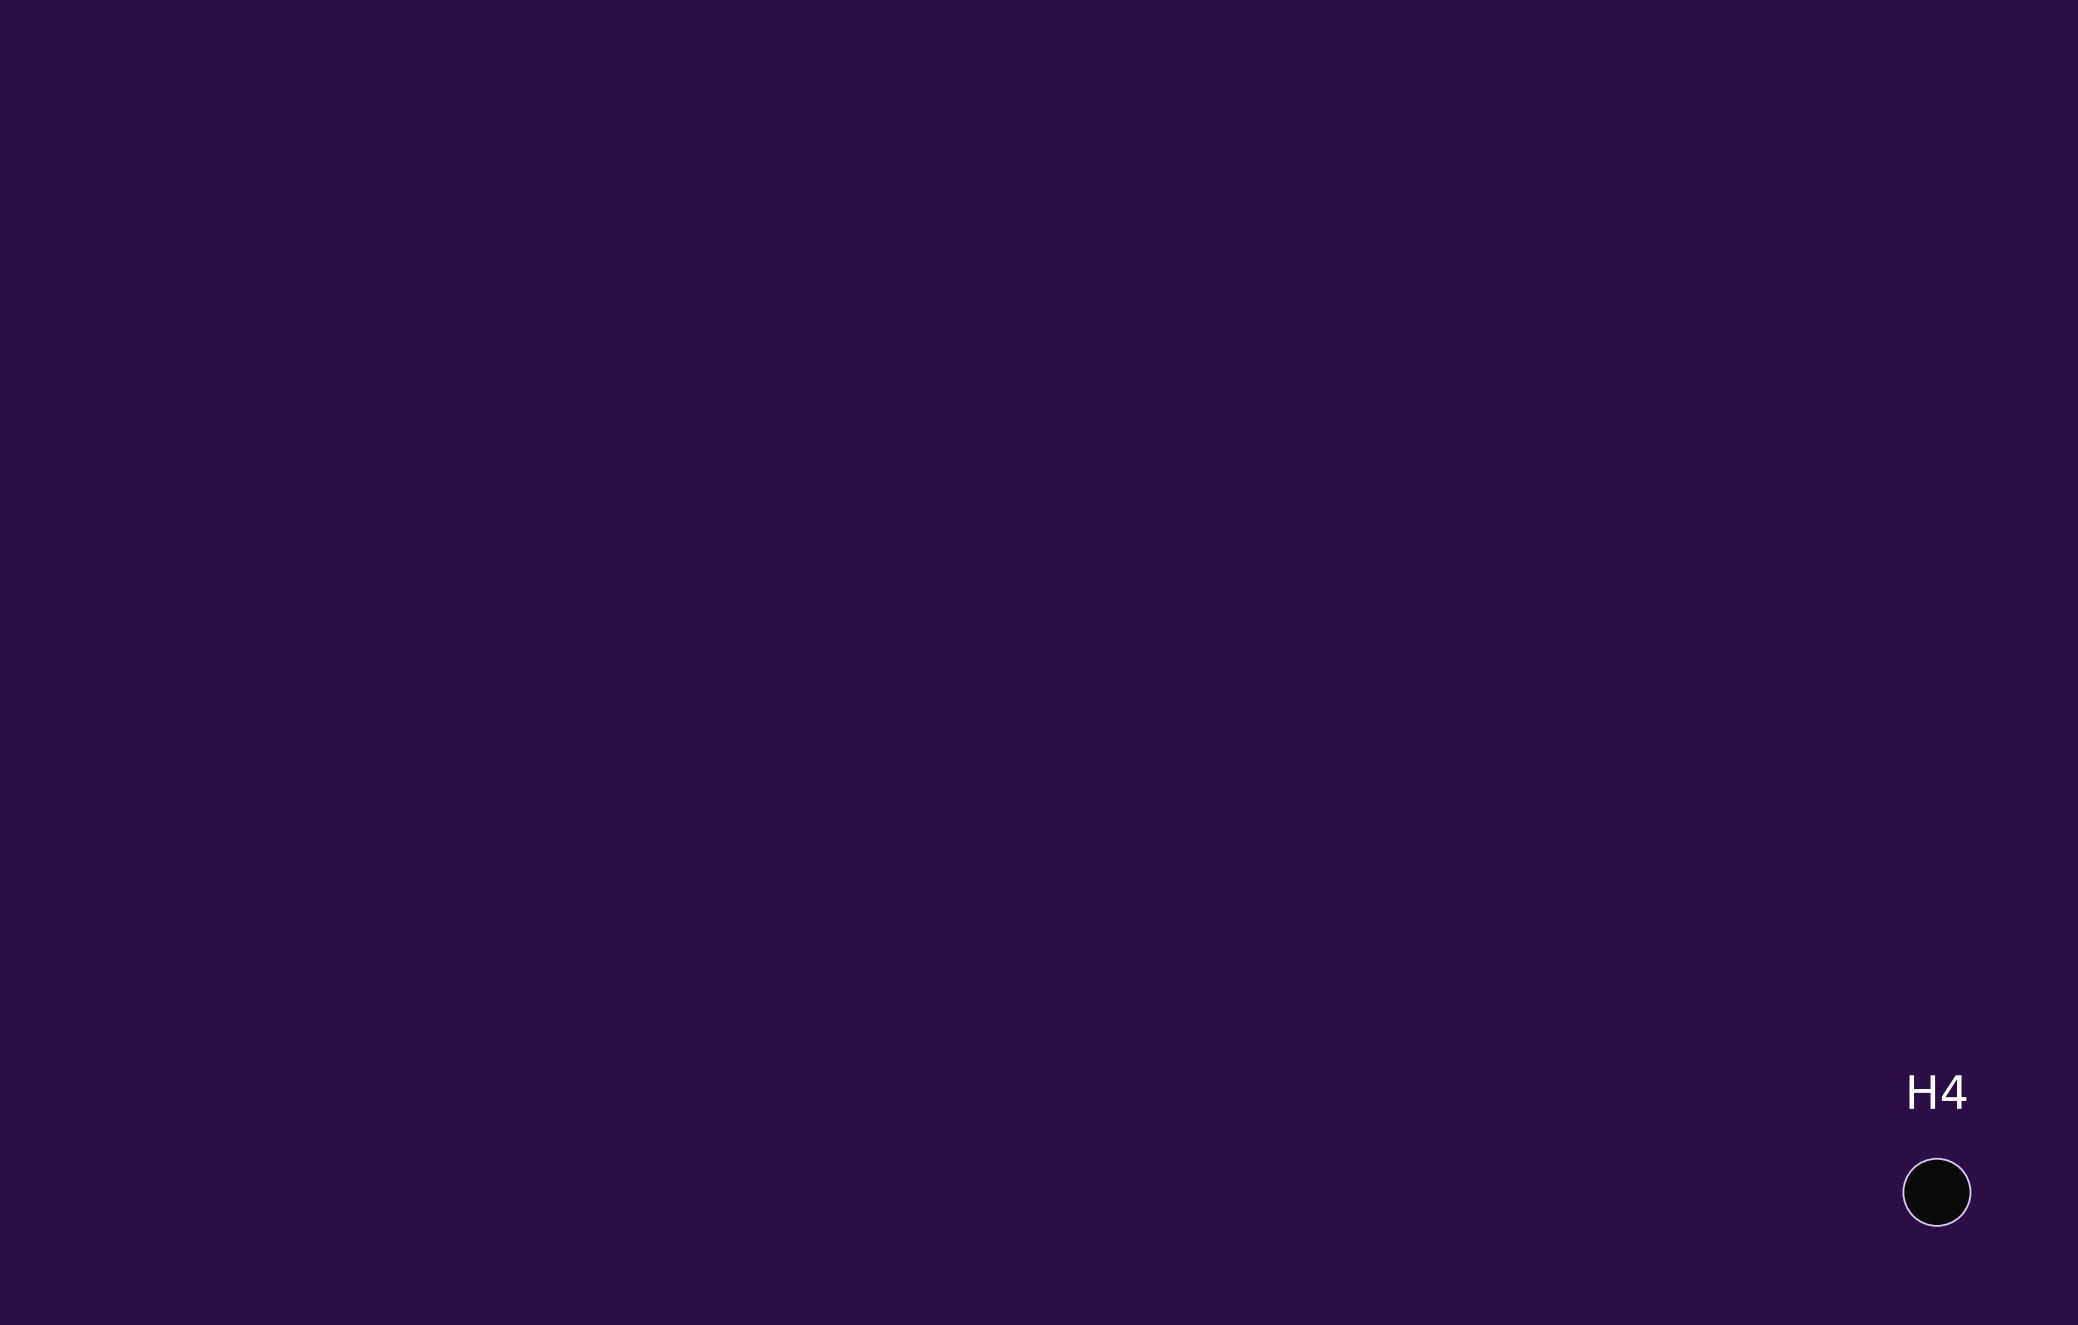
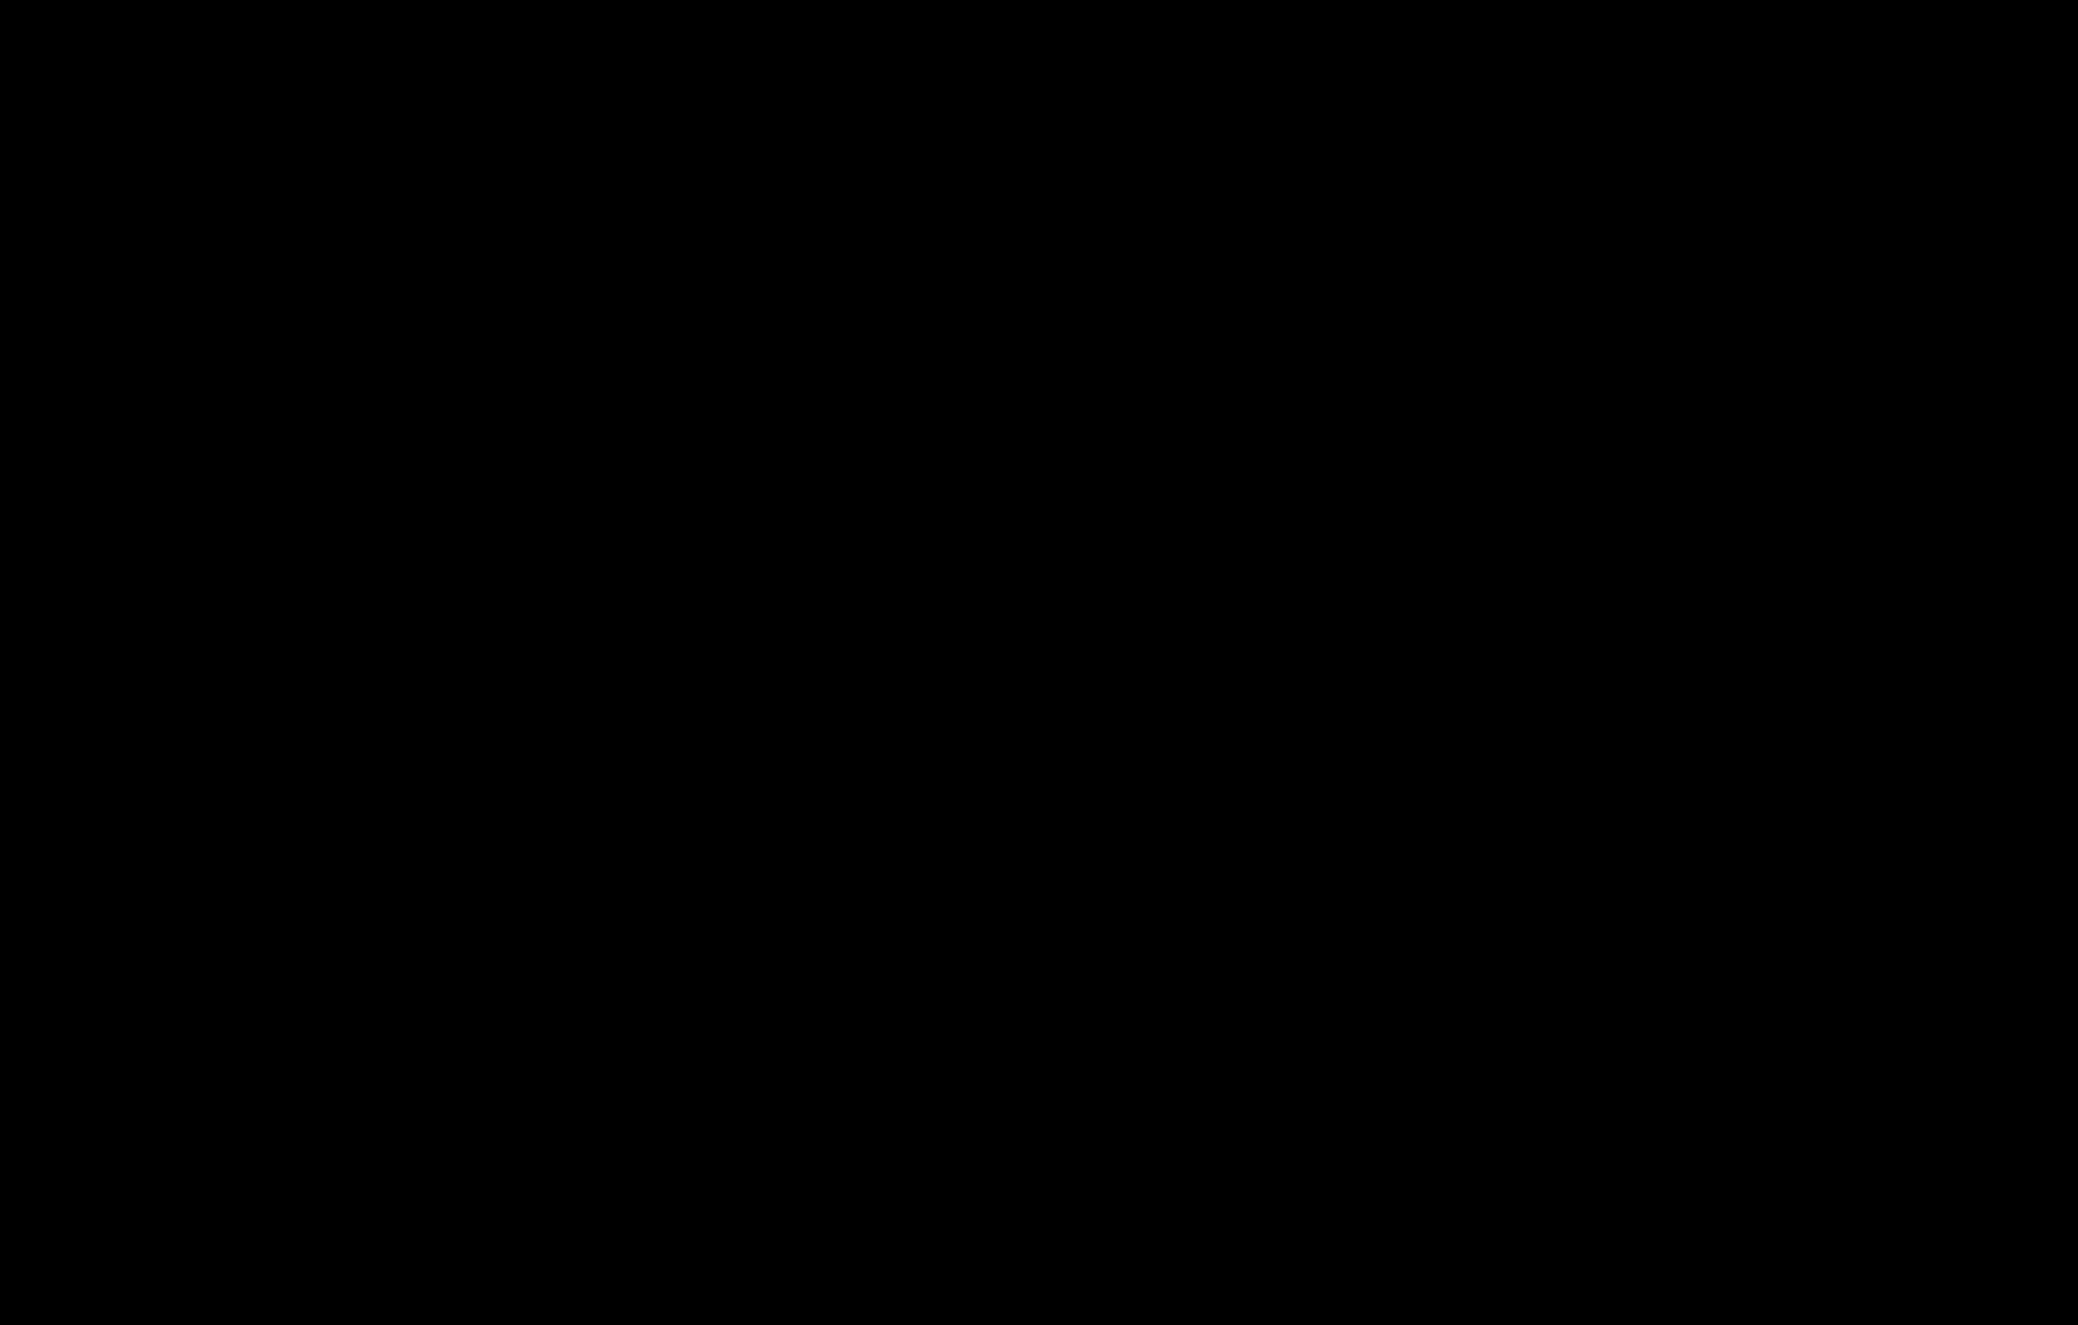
H4: (1936, 1192) -> none

